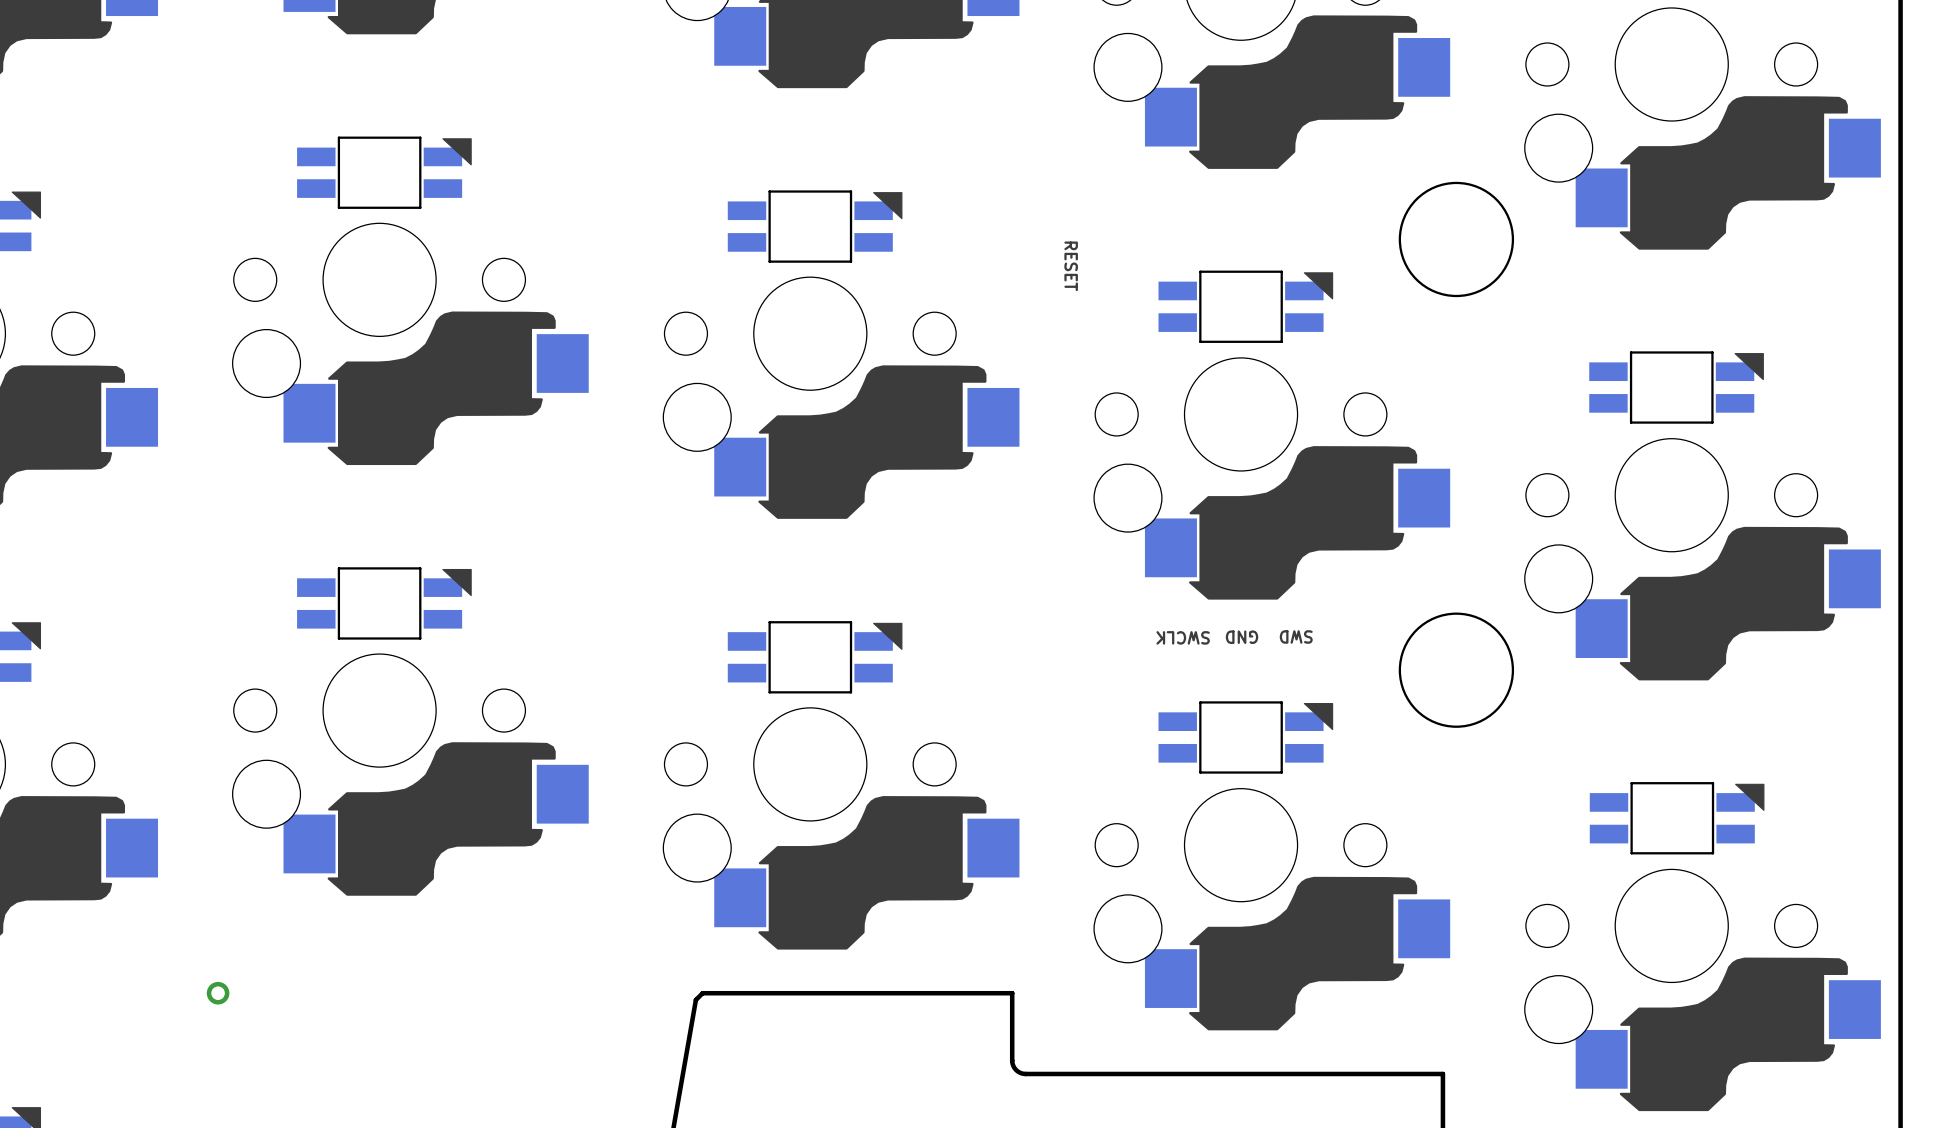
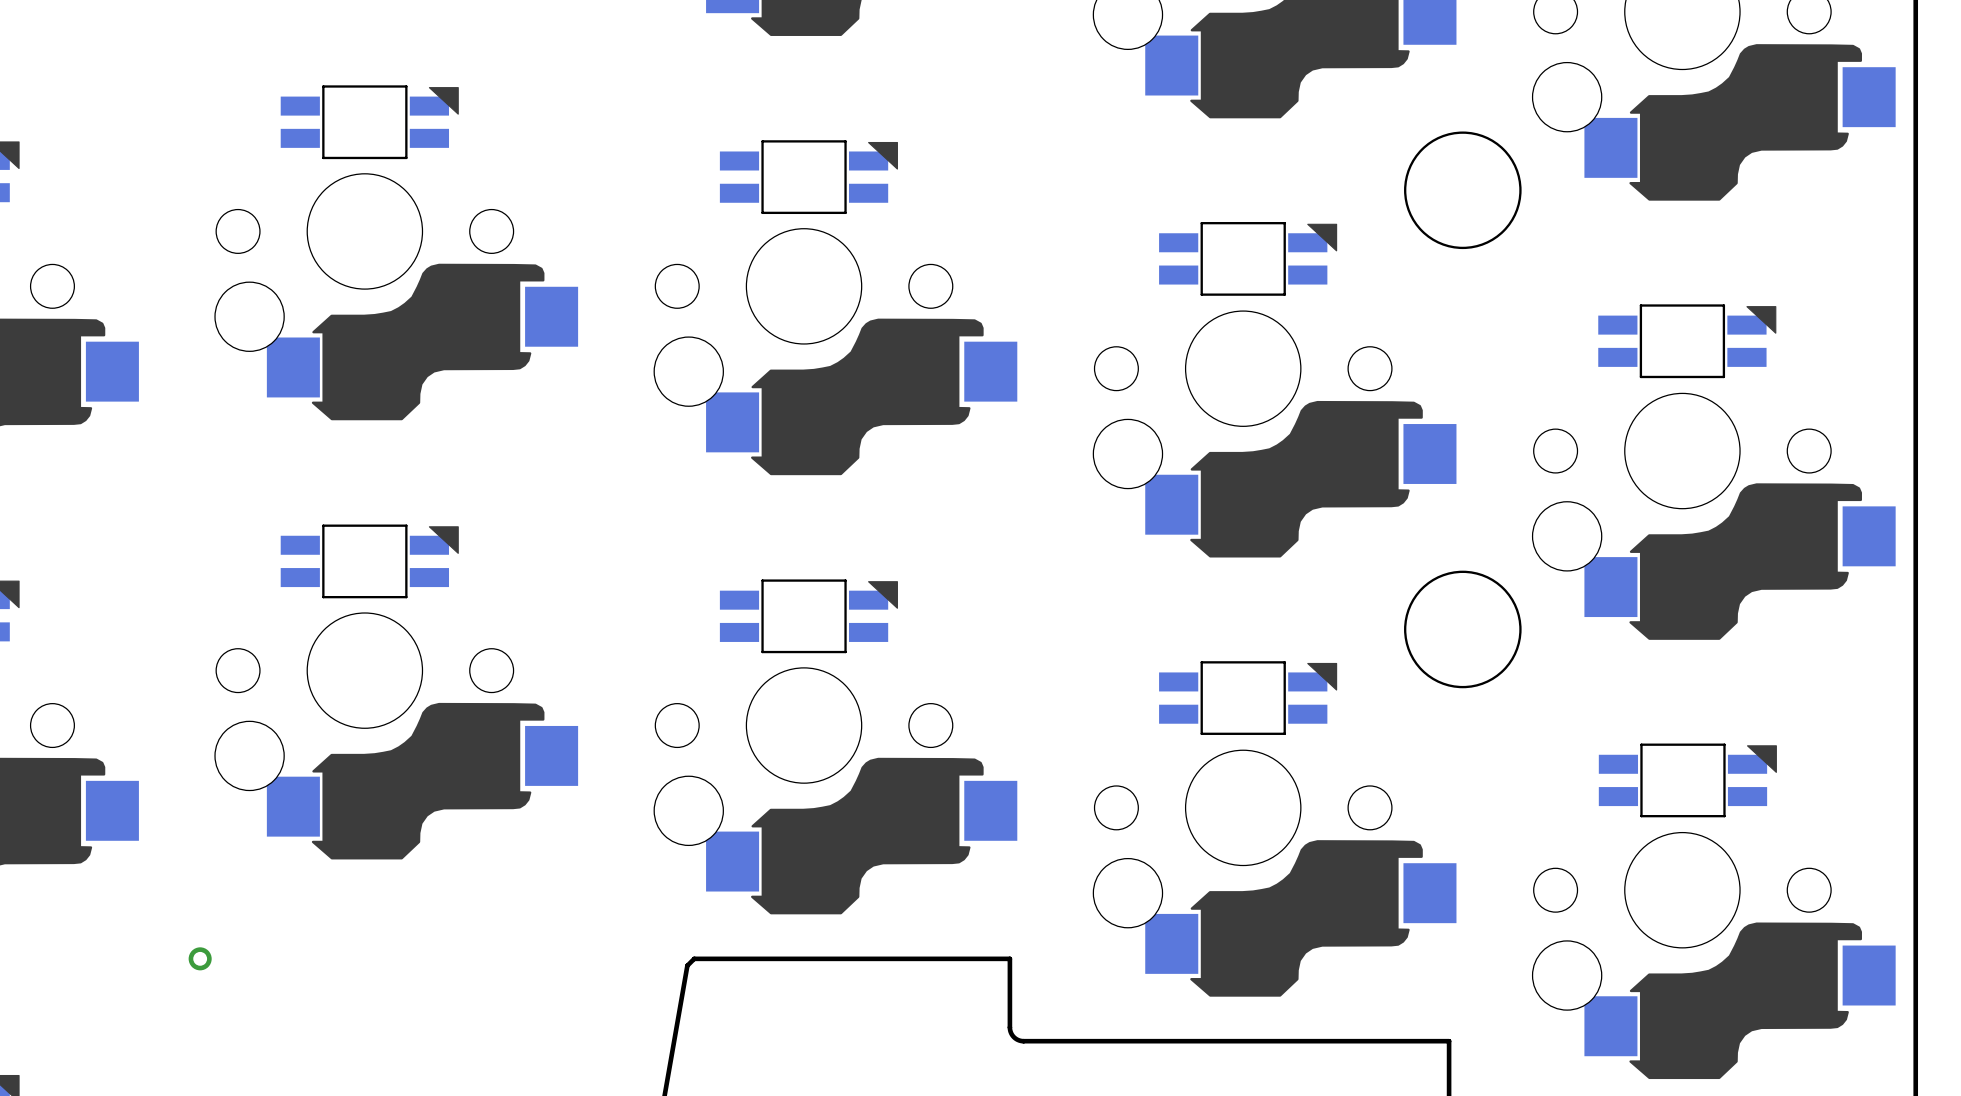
text: RESET (1071, 266) -> none
text: SWD (1296, 636) -> none
text: SWCLK (1183, 637) -> none
text: GND (1242, 637) -> none

